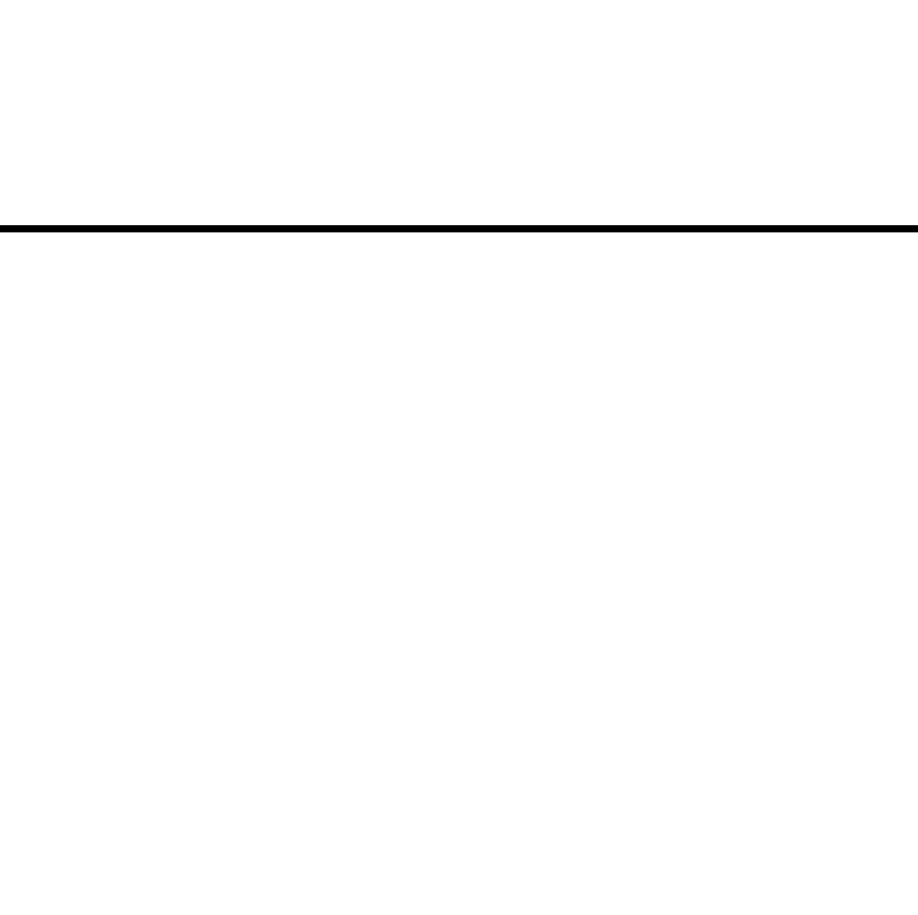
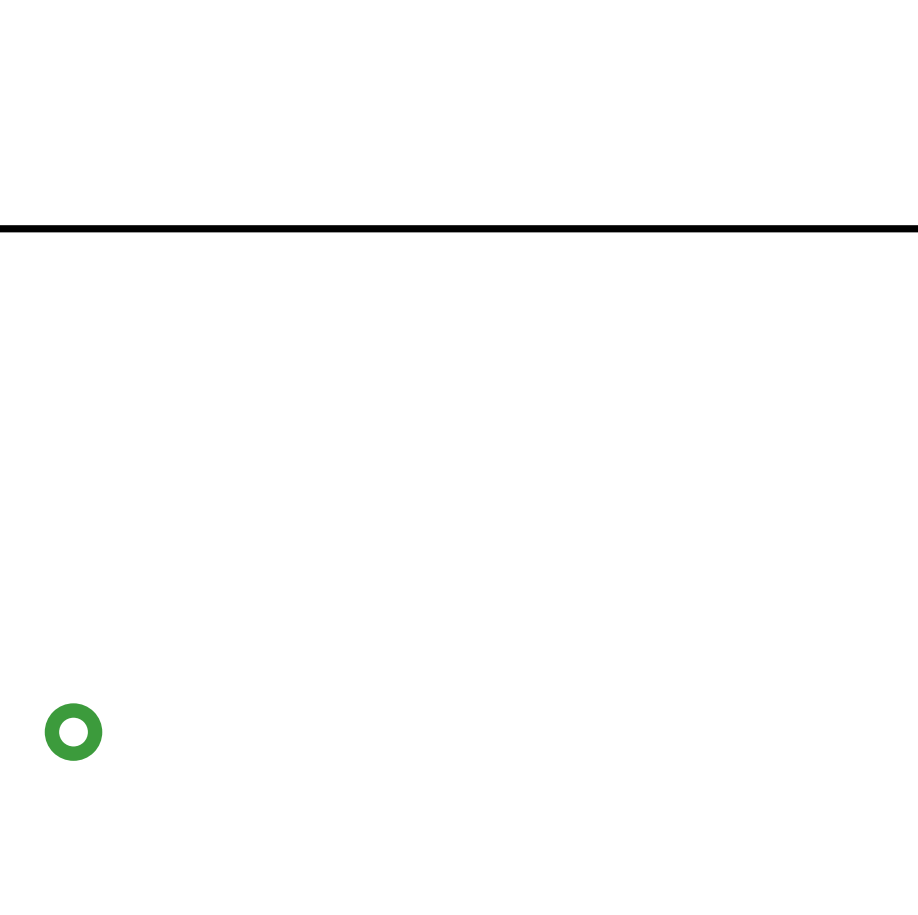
via: none -> (73, 732)

